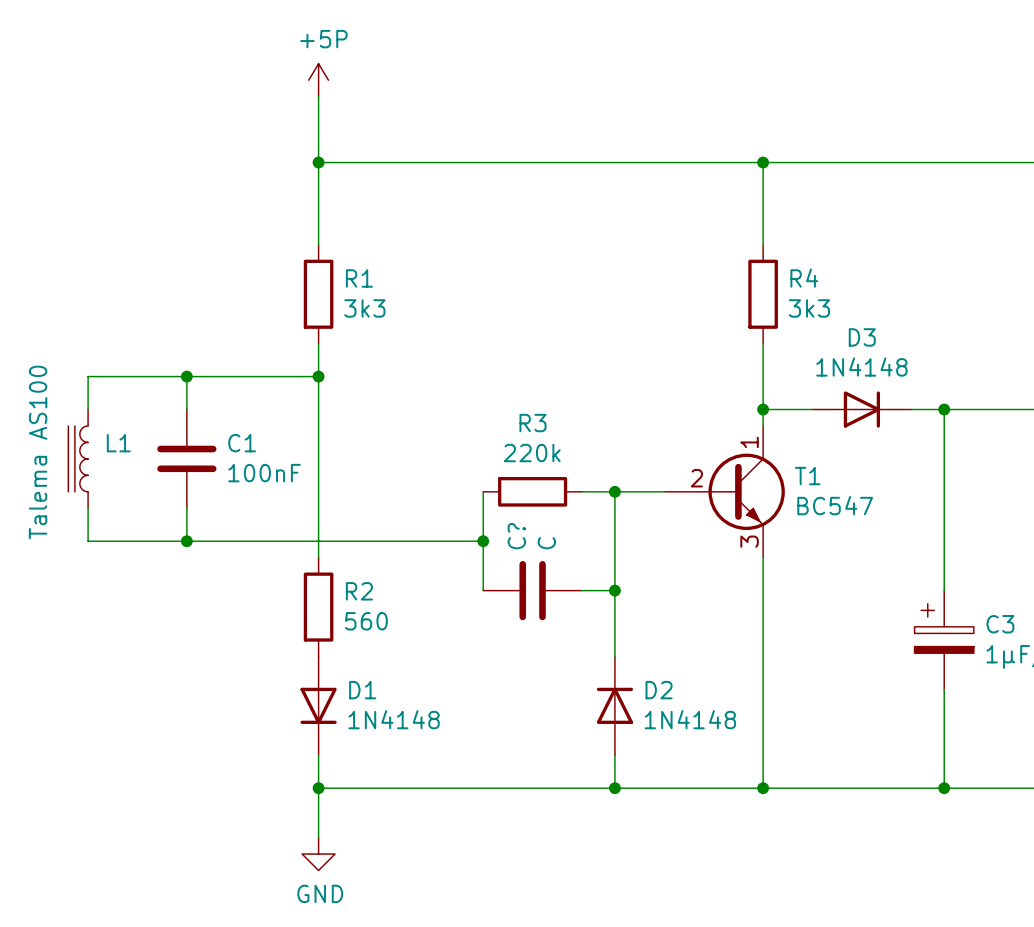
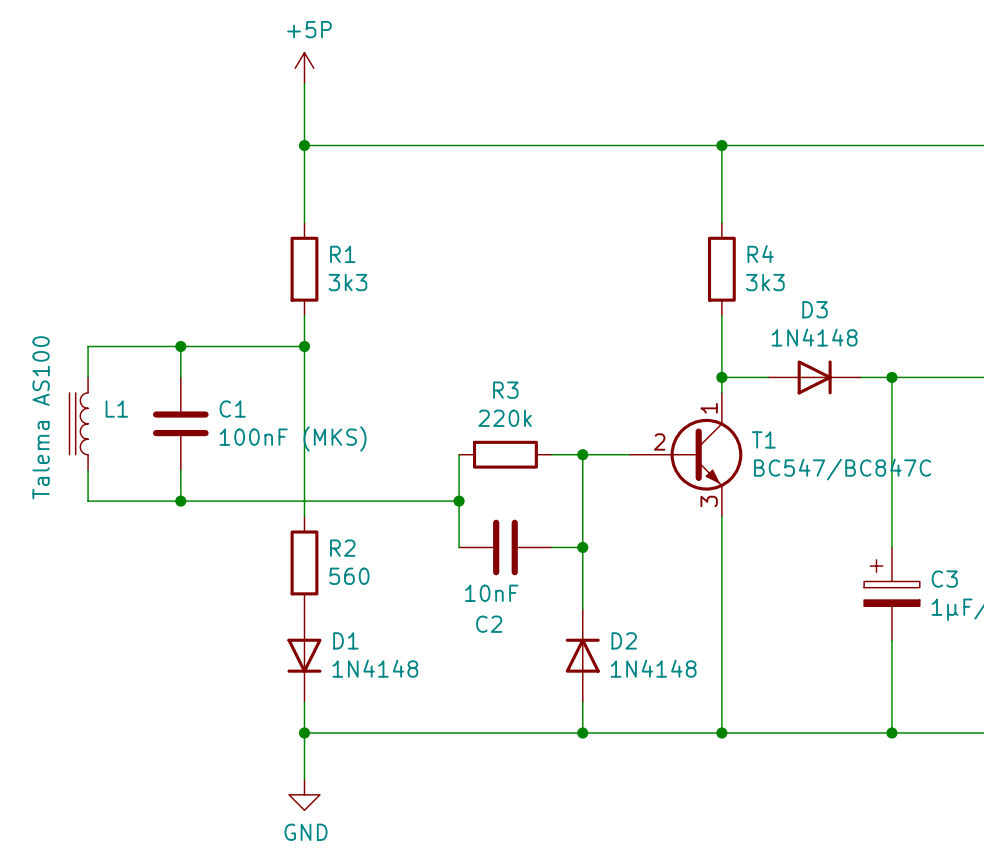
C1 value: 100nF (264, 473) -> 100nF (MKS) (293, 438)
T1 value: BC547 (835, 505) -> BC547/BC847C (842, 469)
C? name: C? (516, 536) -> C2 (489, 624)
C? value: C (546, 543) -> 10nF (491, 593)

